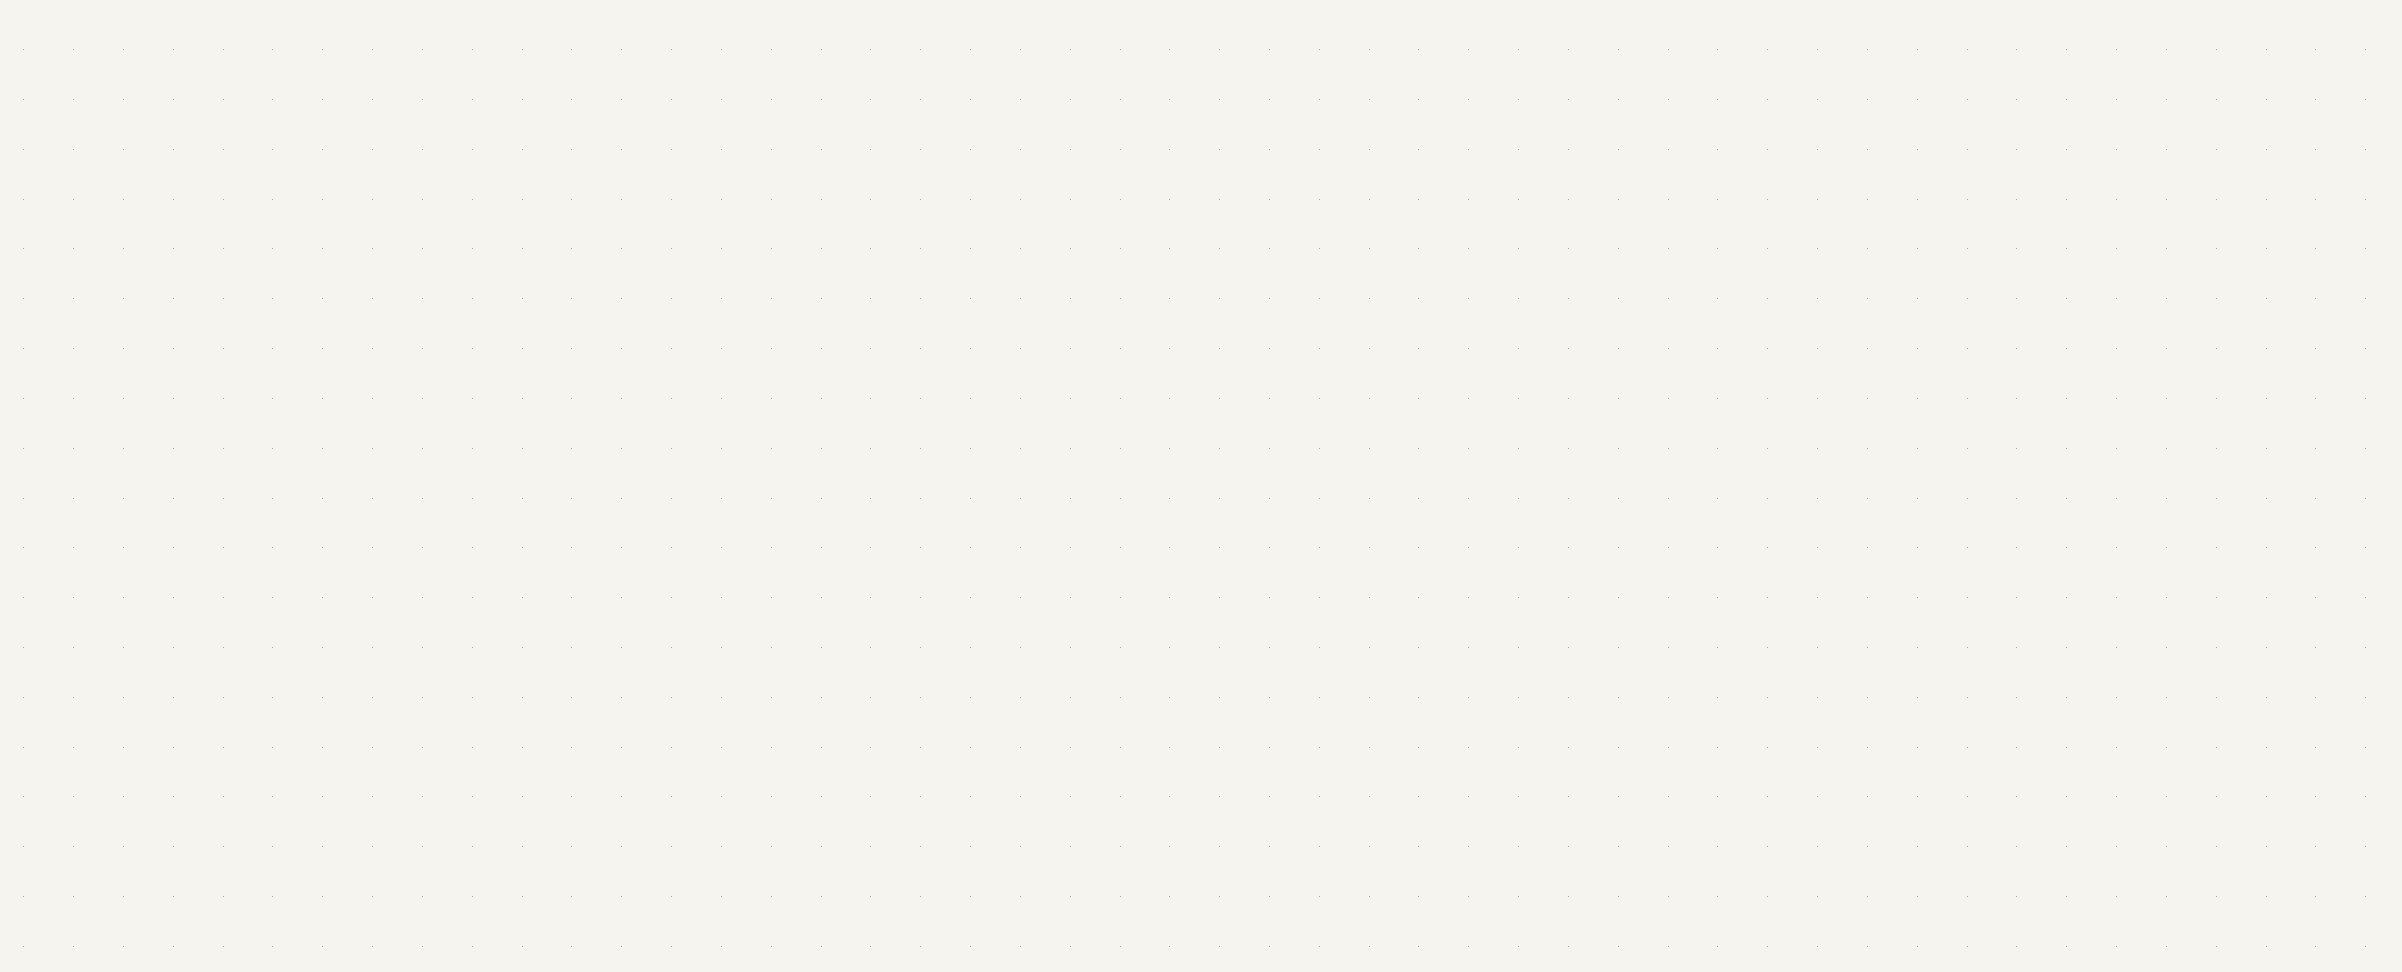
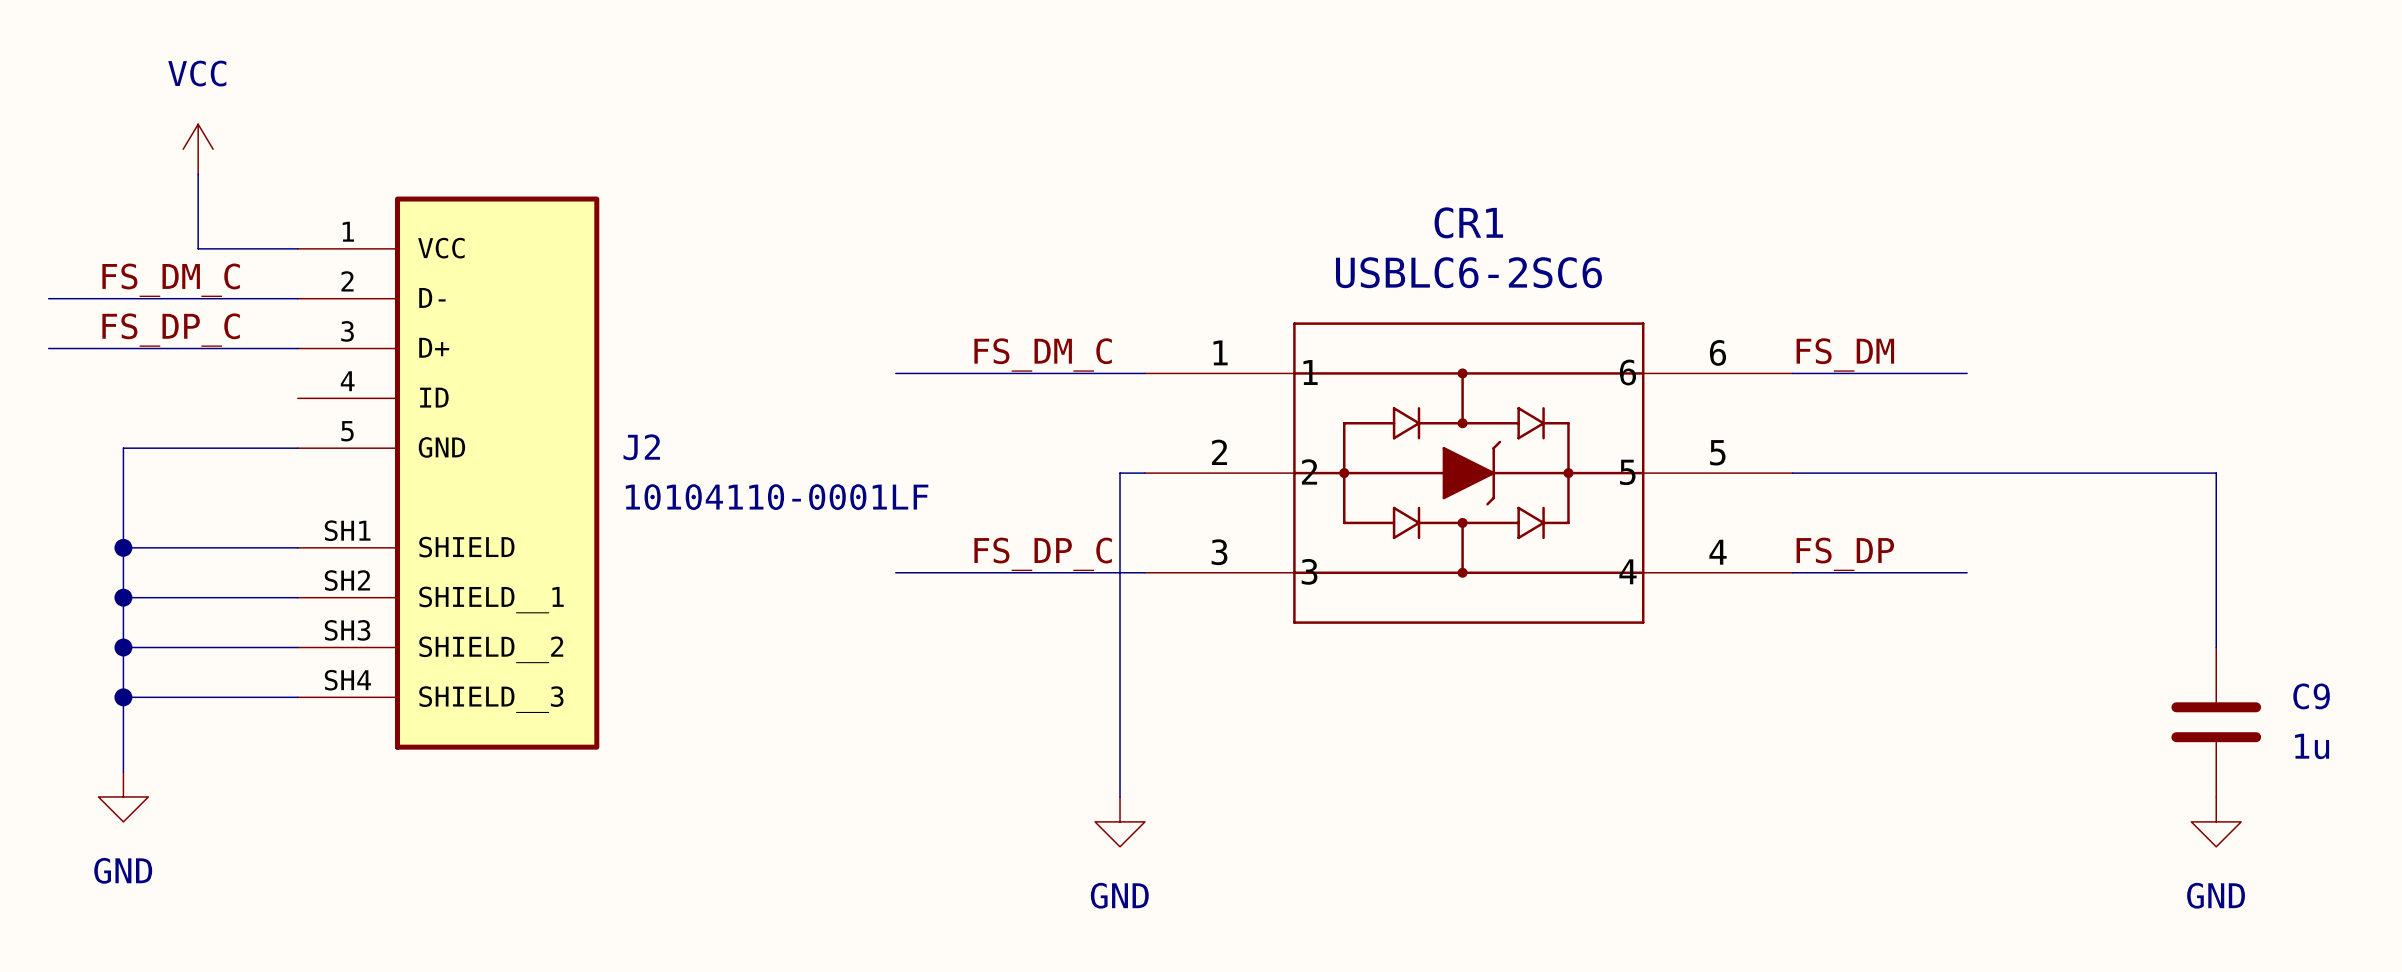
power symbol: none -> VCC (198, 149)
wire: none -> (198, 174) (198, 248) (297, 248)
label: none -> FS_DM_C (171, 280)
wire: none -> (48, 298) (297, 298)
label: none -> FS_DP_C (171, 330)
wire: none -> (48, 348) (297, 348)
label: none -> FS_DM_C (1043, 355)
label: none -> FS_DM (1845, 355)
wire: none -> (895, 373) (1144, 373)
wire: none -> (1792, 373) (1967, 373)
wire: none -> (297, 448) (123, 448) (123, 772)
J2: none -> 10104110-0001LF (448, 473)
wire: none -> (1144, 473) (1120, 473) (1120, 796)
CR1: none -> USBLC6-2SC6 (1468, 473)
wire: none -> (1792, 473) (2216, 473) (2216, 647)
wire: none -> (123, 547) (297, 547)
junction: none -> (123, 547)
label: none -> FS_DP_C (1043, 554)
label: none -> FS_DP (1845, 554)
wire: none -> (895, 572) (1144, 572)
wire: none -> (1792, 572) (1967, 572)
wire: none -> (123, 597) (297, 597)
junction: none -> (123, 597)
wire: none -> (123, 647) (297, 647)
junction: none -> (123, 647)
wire: none -> (123, 697) (297, 697)
junction: none -> (123, 697)
C9: none -> 1u (2216, 722)
power symbol: none -> GND (123, 796)
power symbol: none -> GND (1120, 821)
power symbol: none -> GND (2216, 821)

